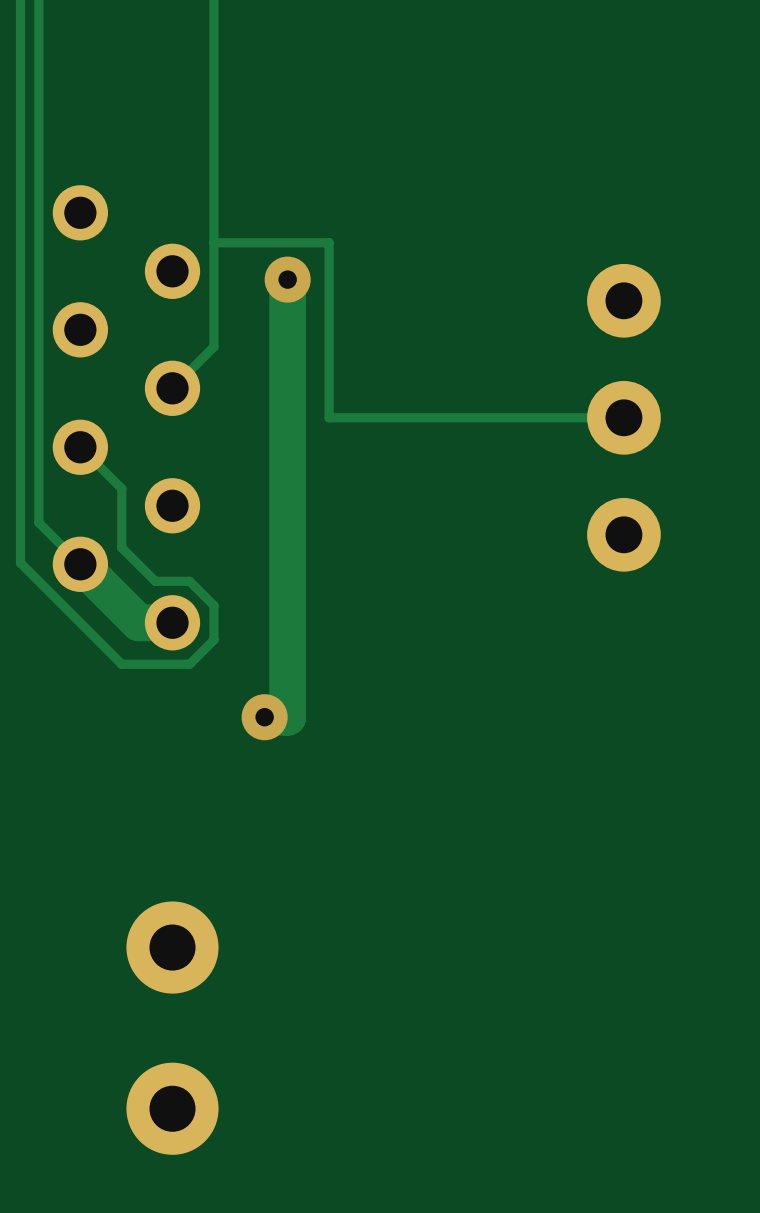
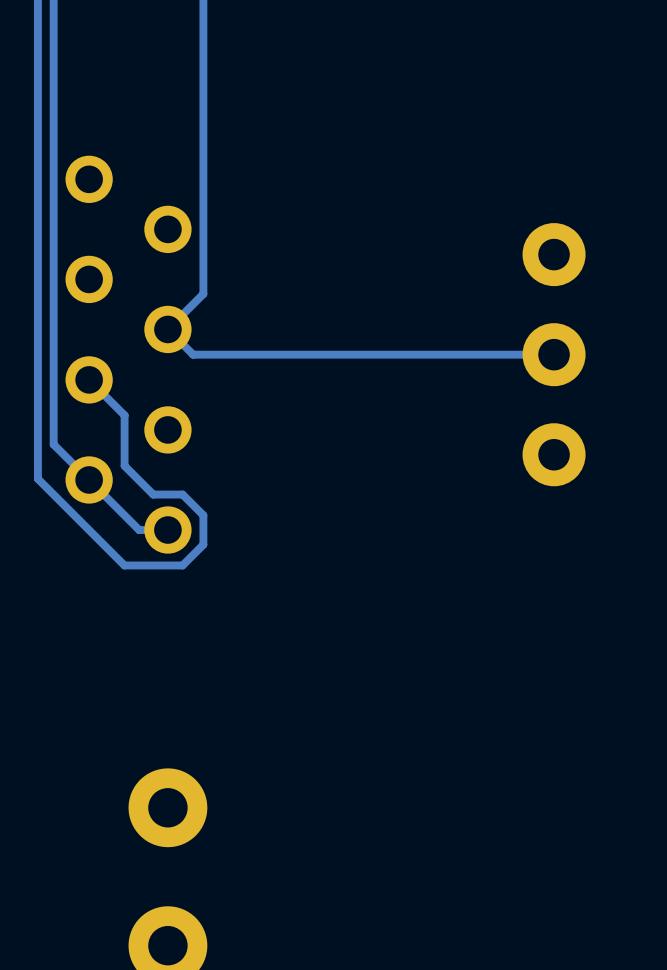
track: (213, 242) (329, 242) (329, 417) -> (167, 329) (193, 354) (301, 354)
track: (287, 279) (287, 717) (264, 717) -> none
via: (287, 279) -> none
track width: thick (80, 564) (138, 622) (172, 622) -> thin (89, 479) (139, 530) (167, 530)
via: (264, 717) -> none

